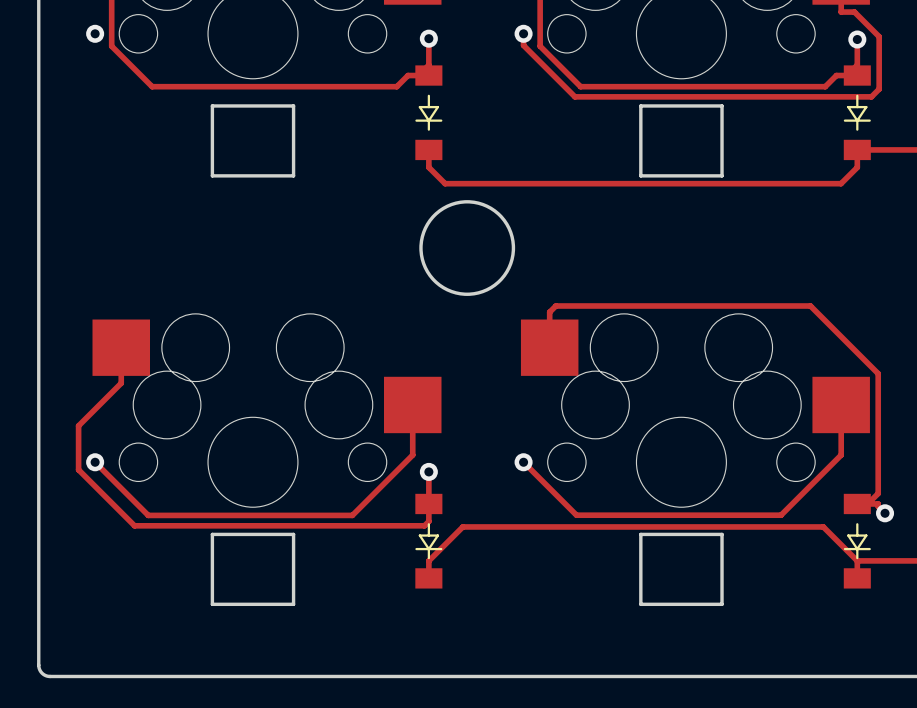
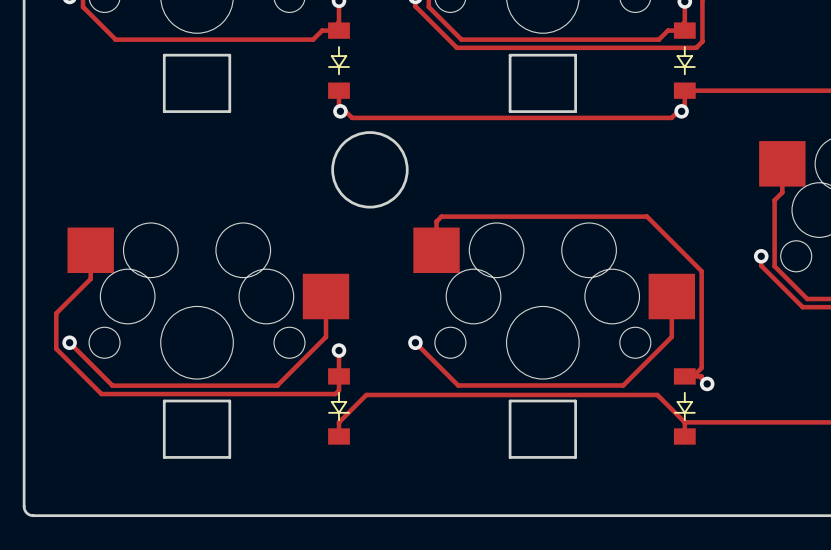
via: none -> (340, 111)
via: none -> (681, 111)

